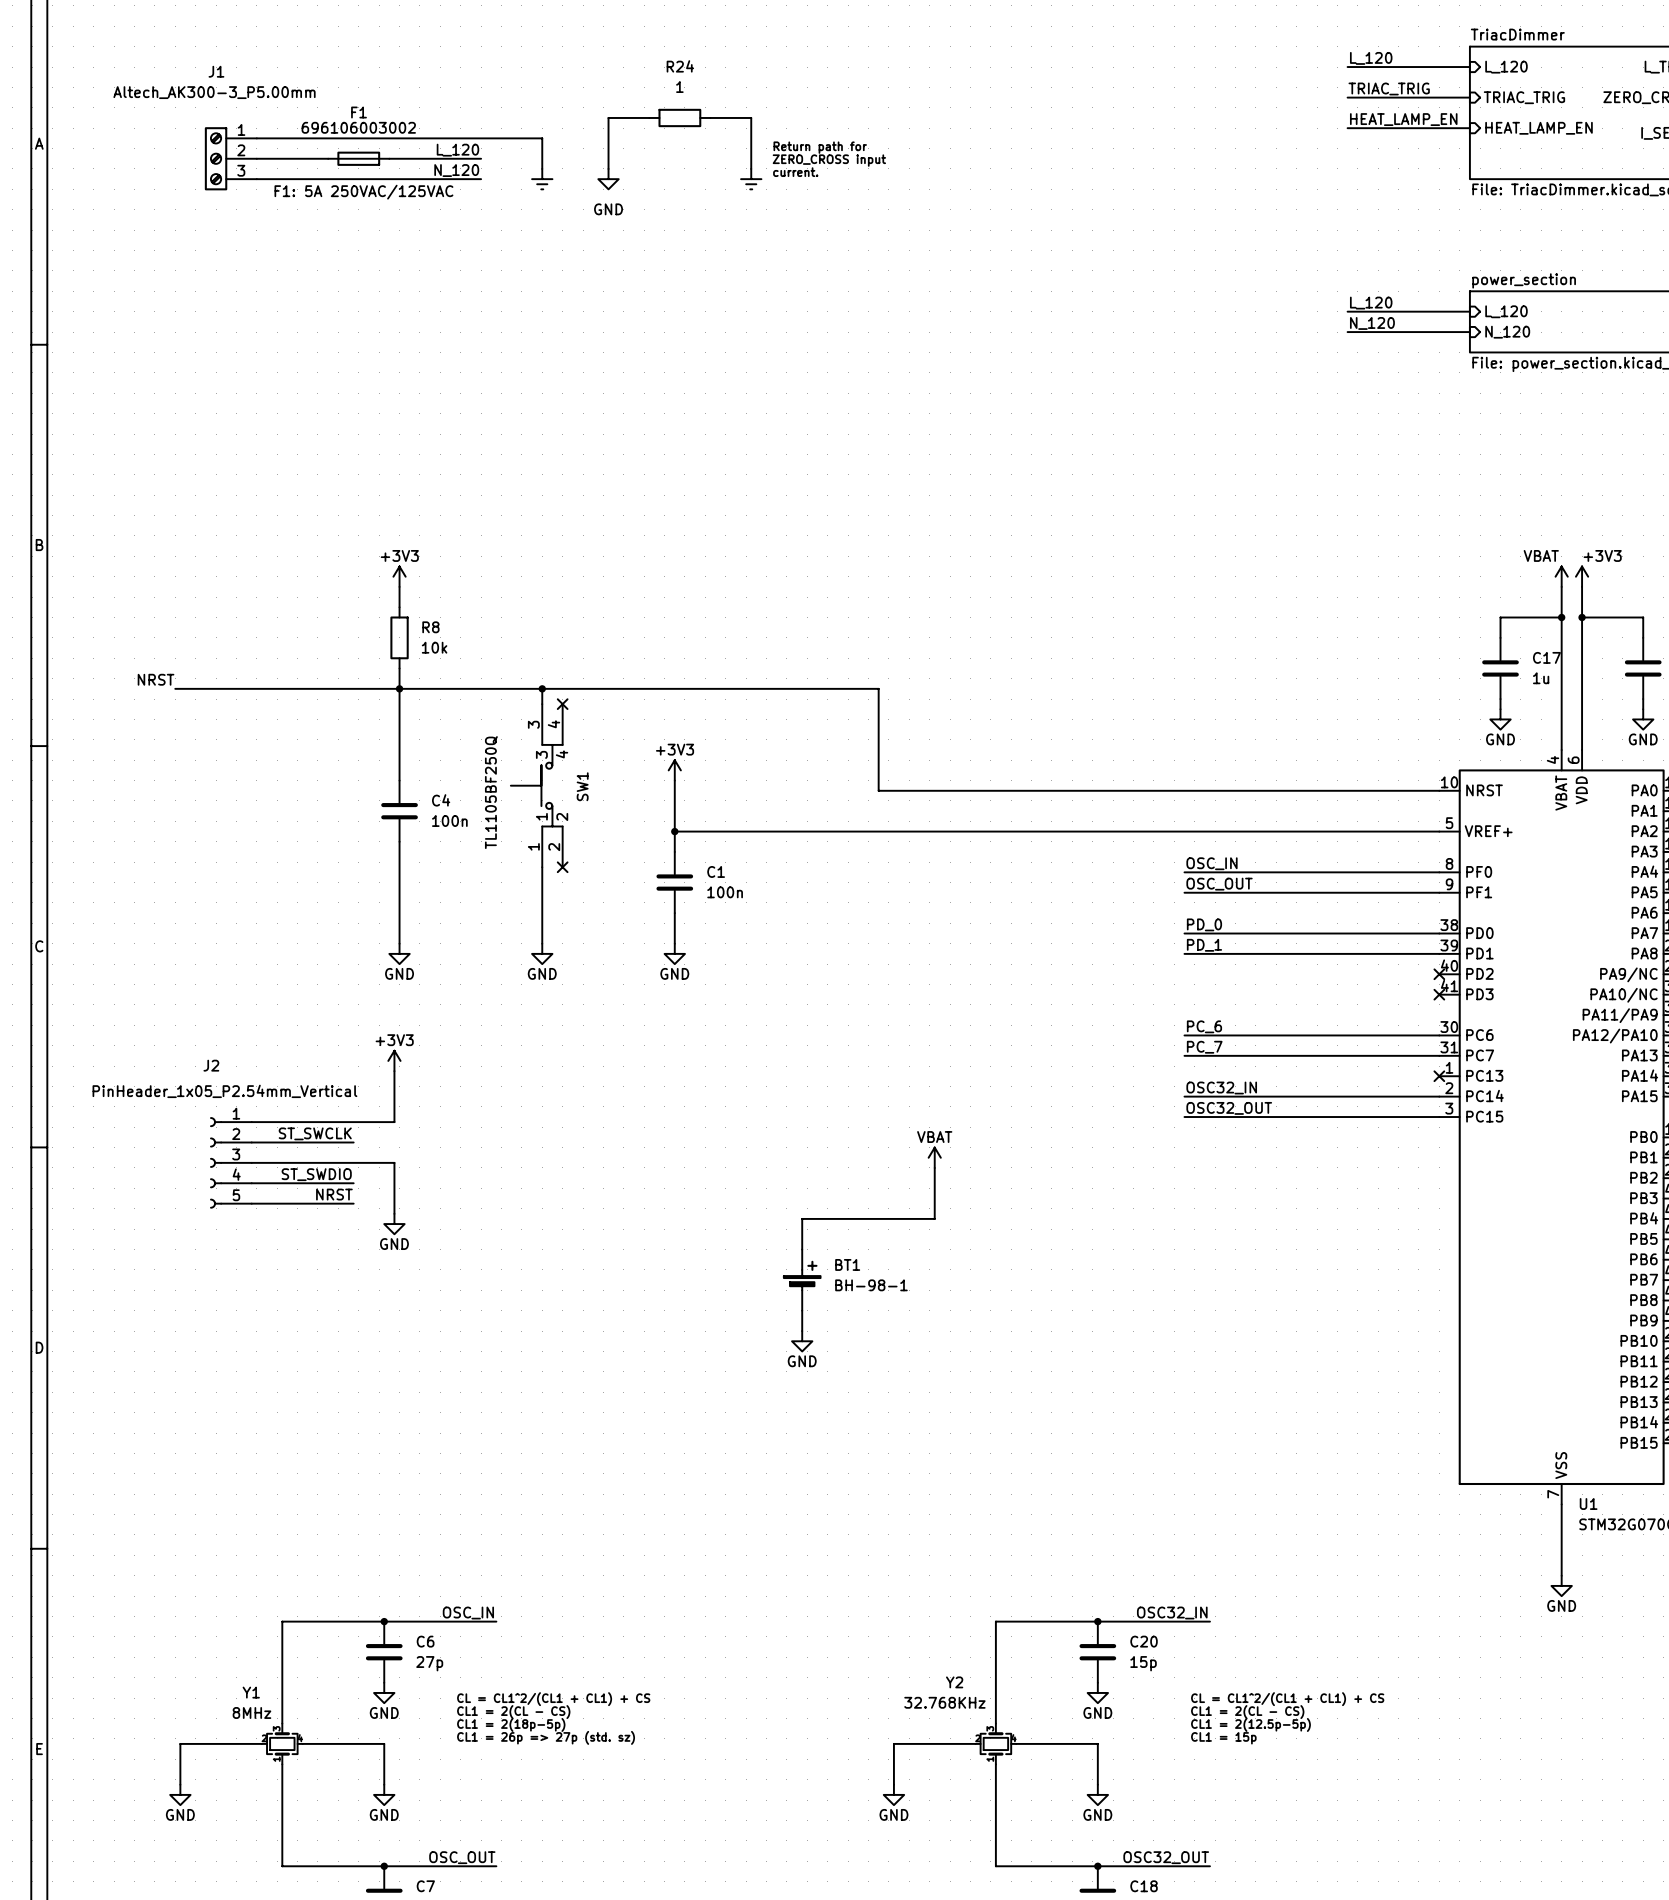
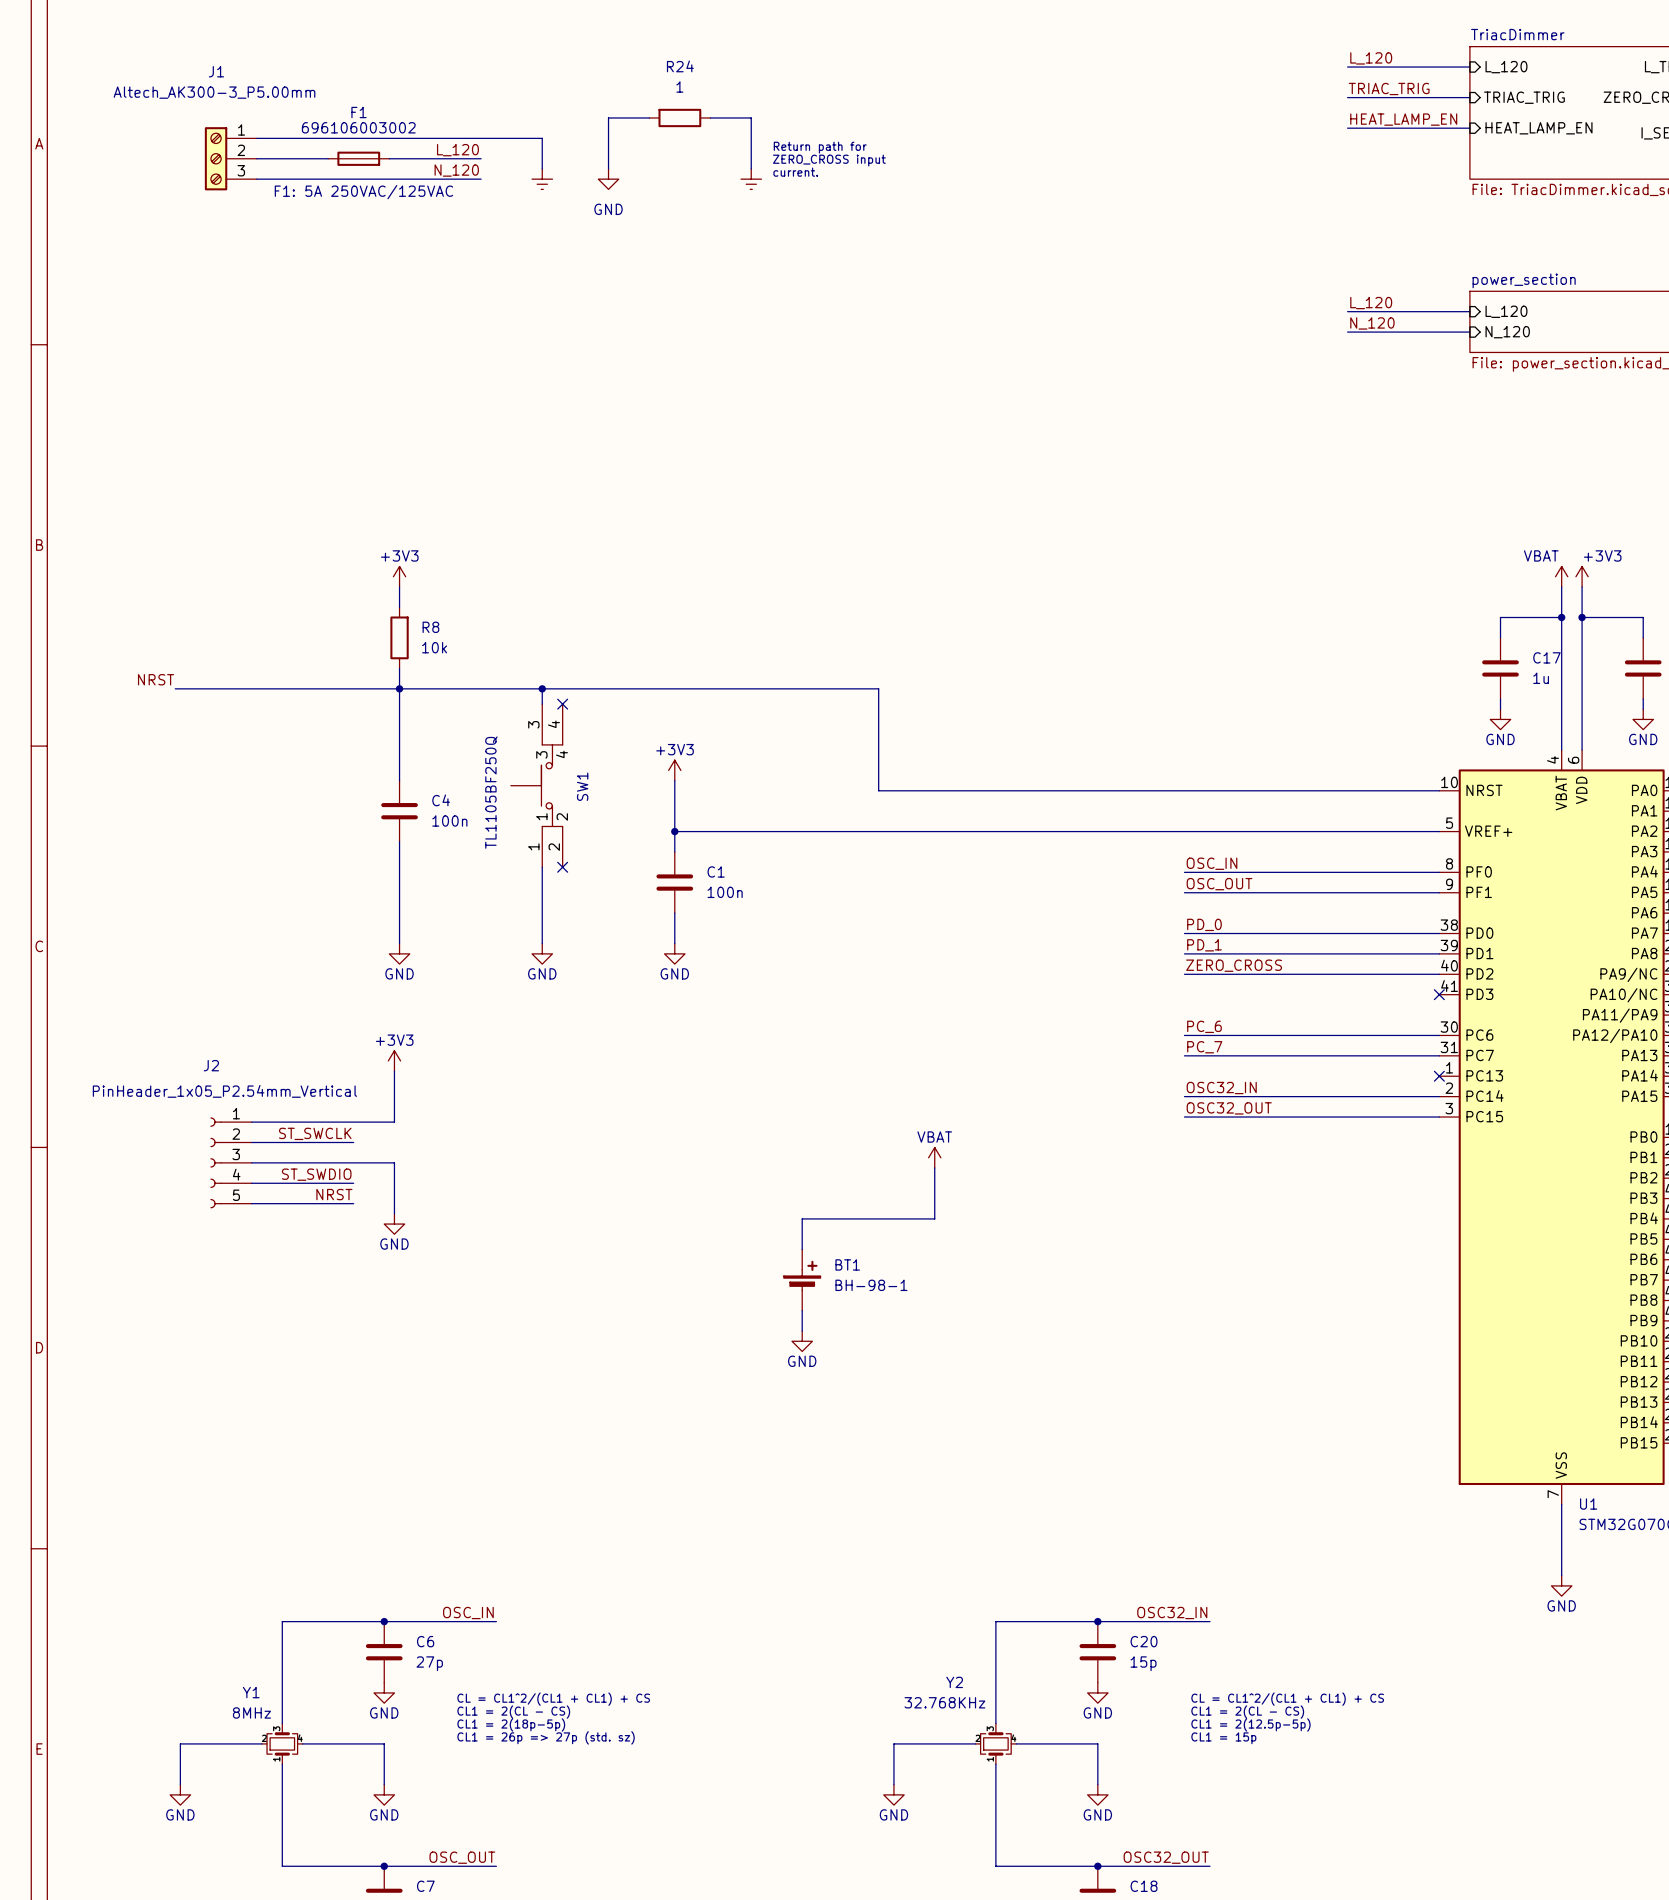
label: none -> ZERO_CROSS (1234, 965)
wire: none -> (1184, 974) (1439, 974)
no-connect mark: (1439, 974) -> none

